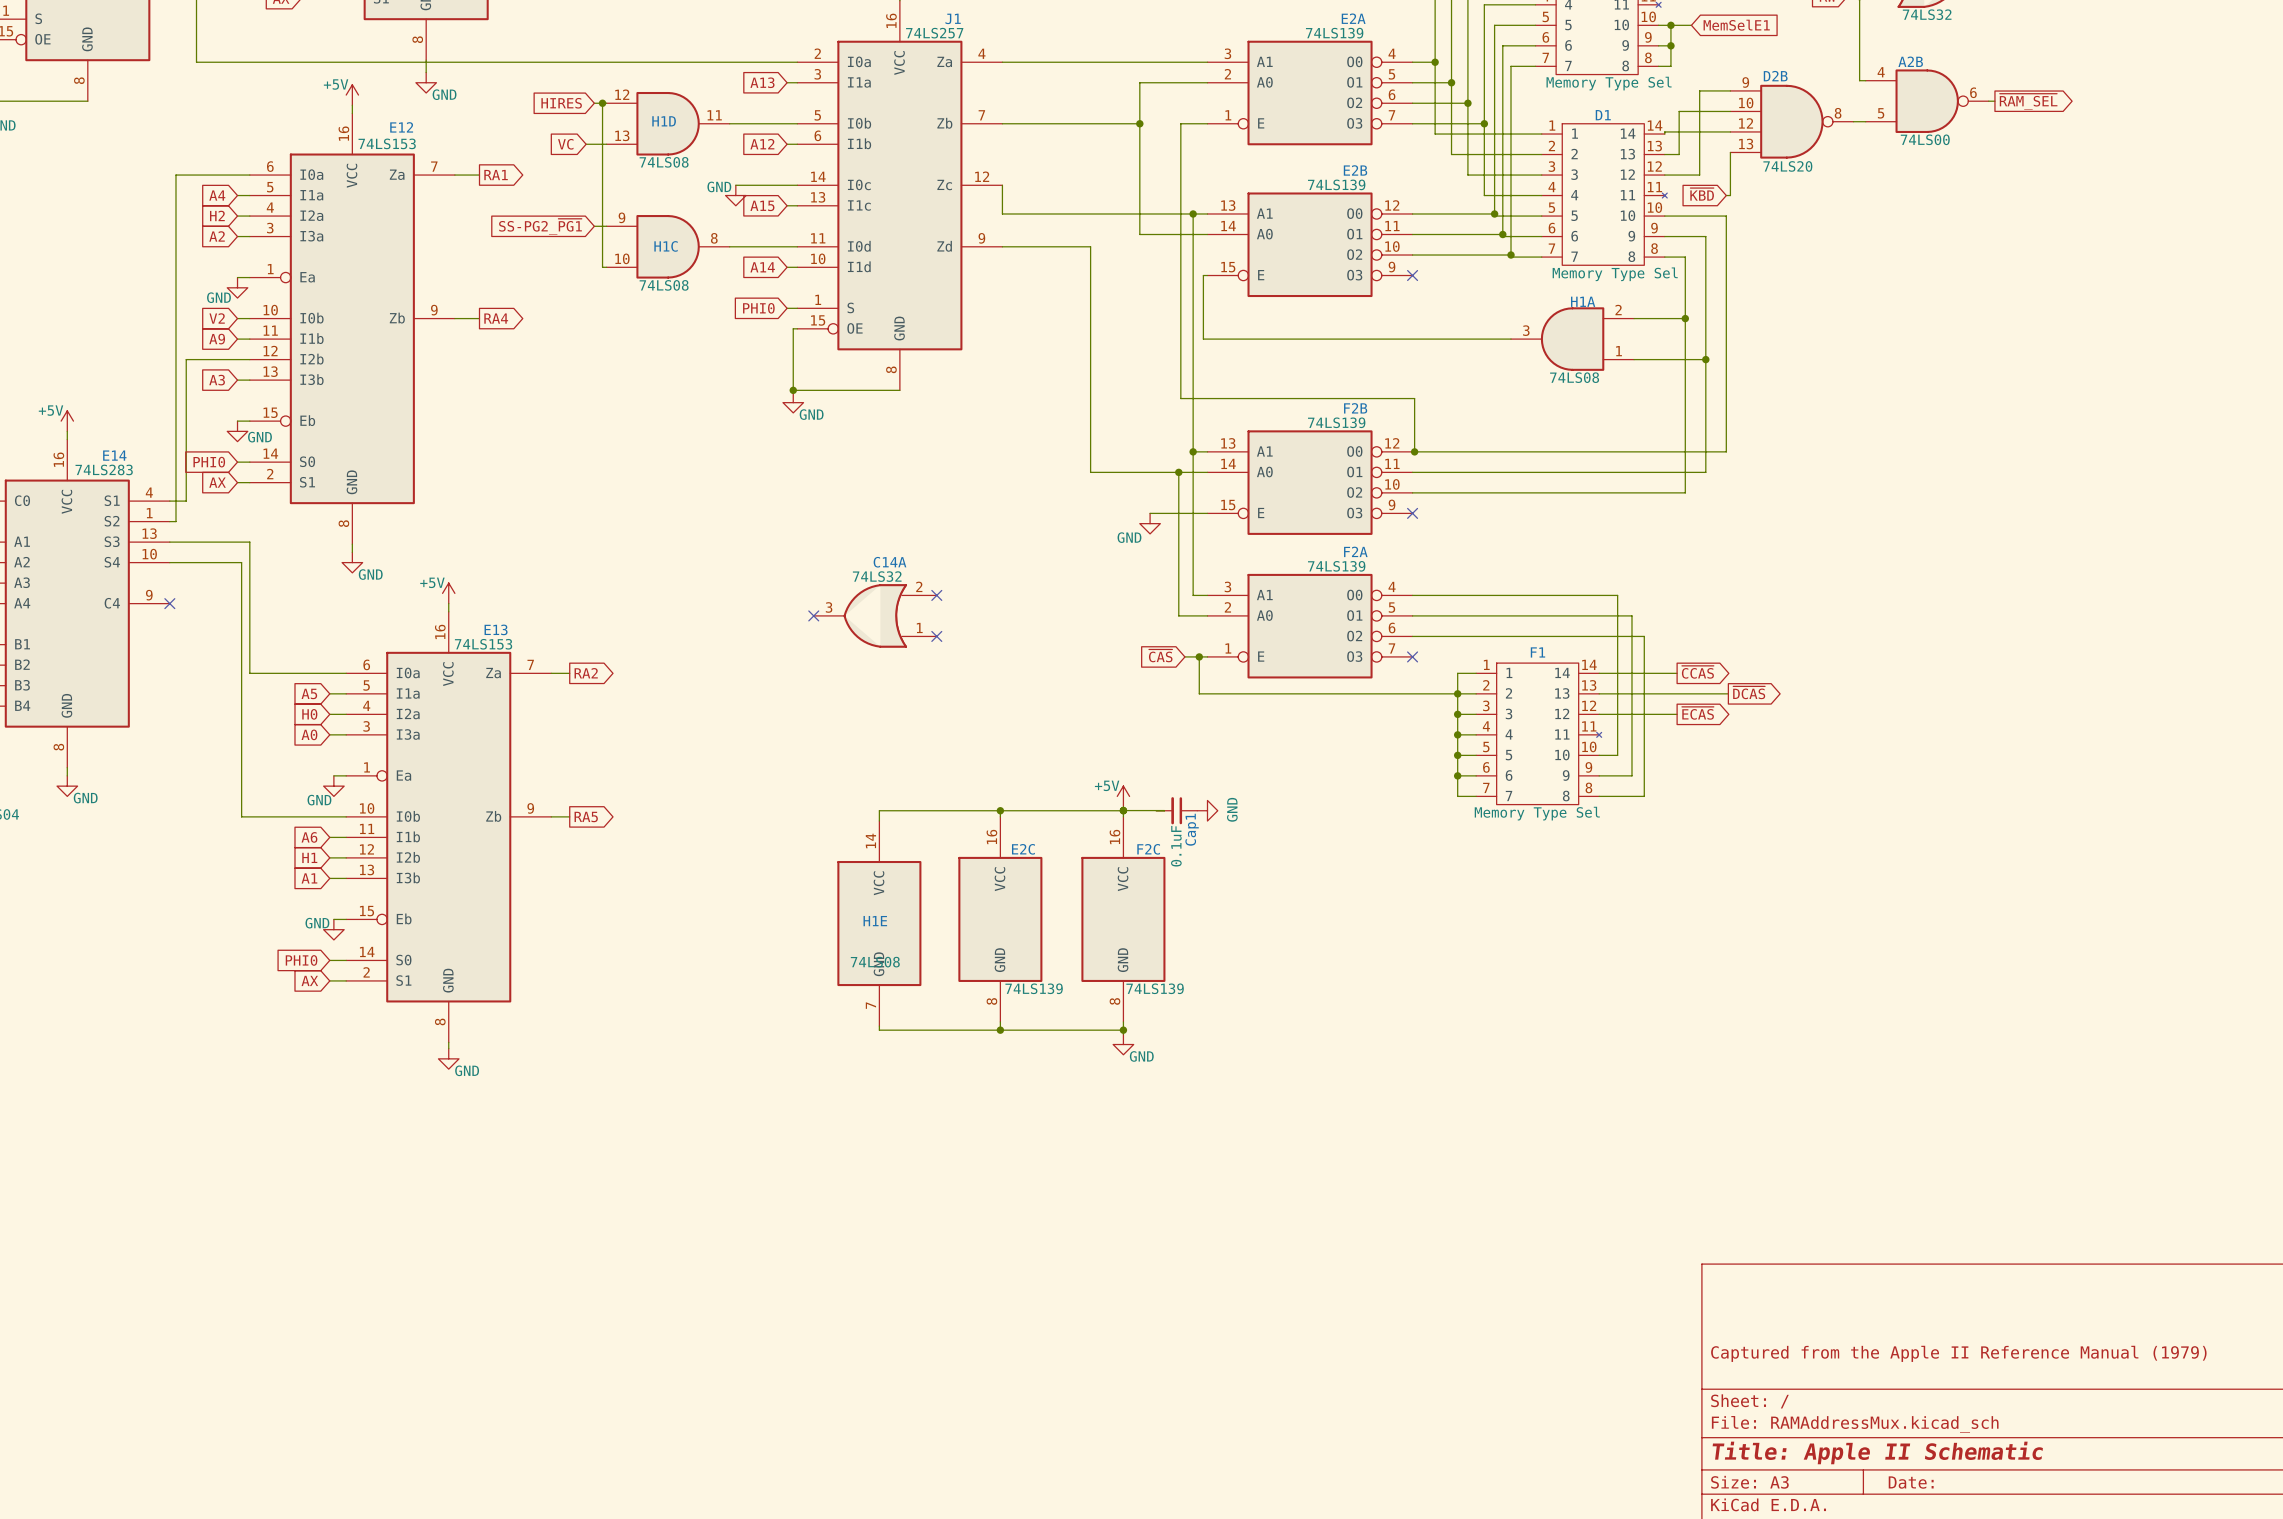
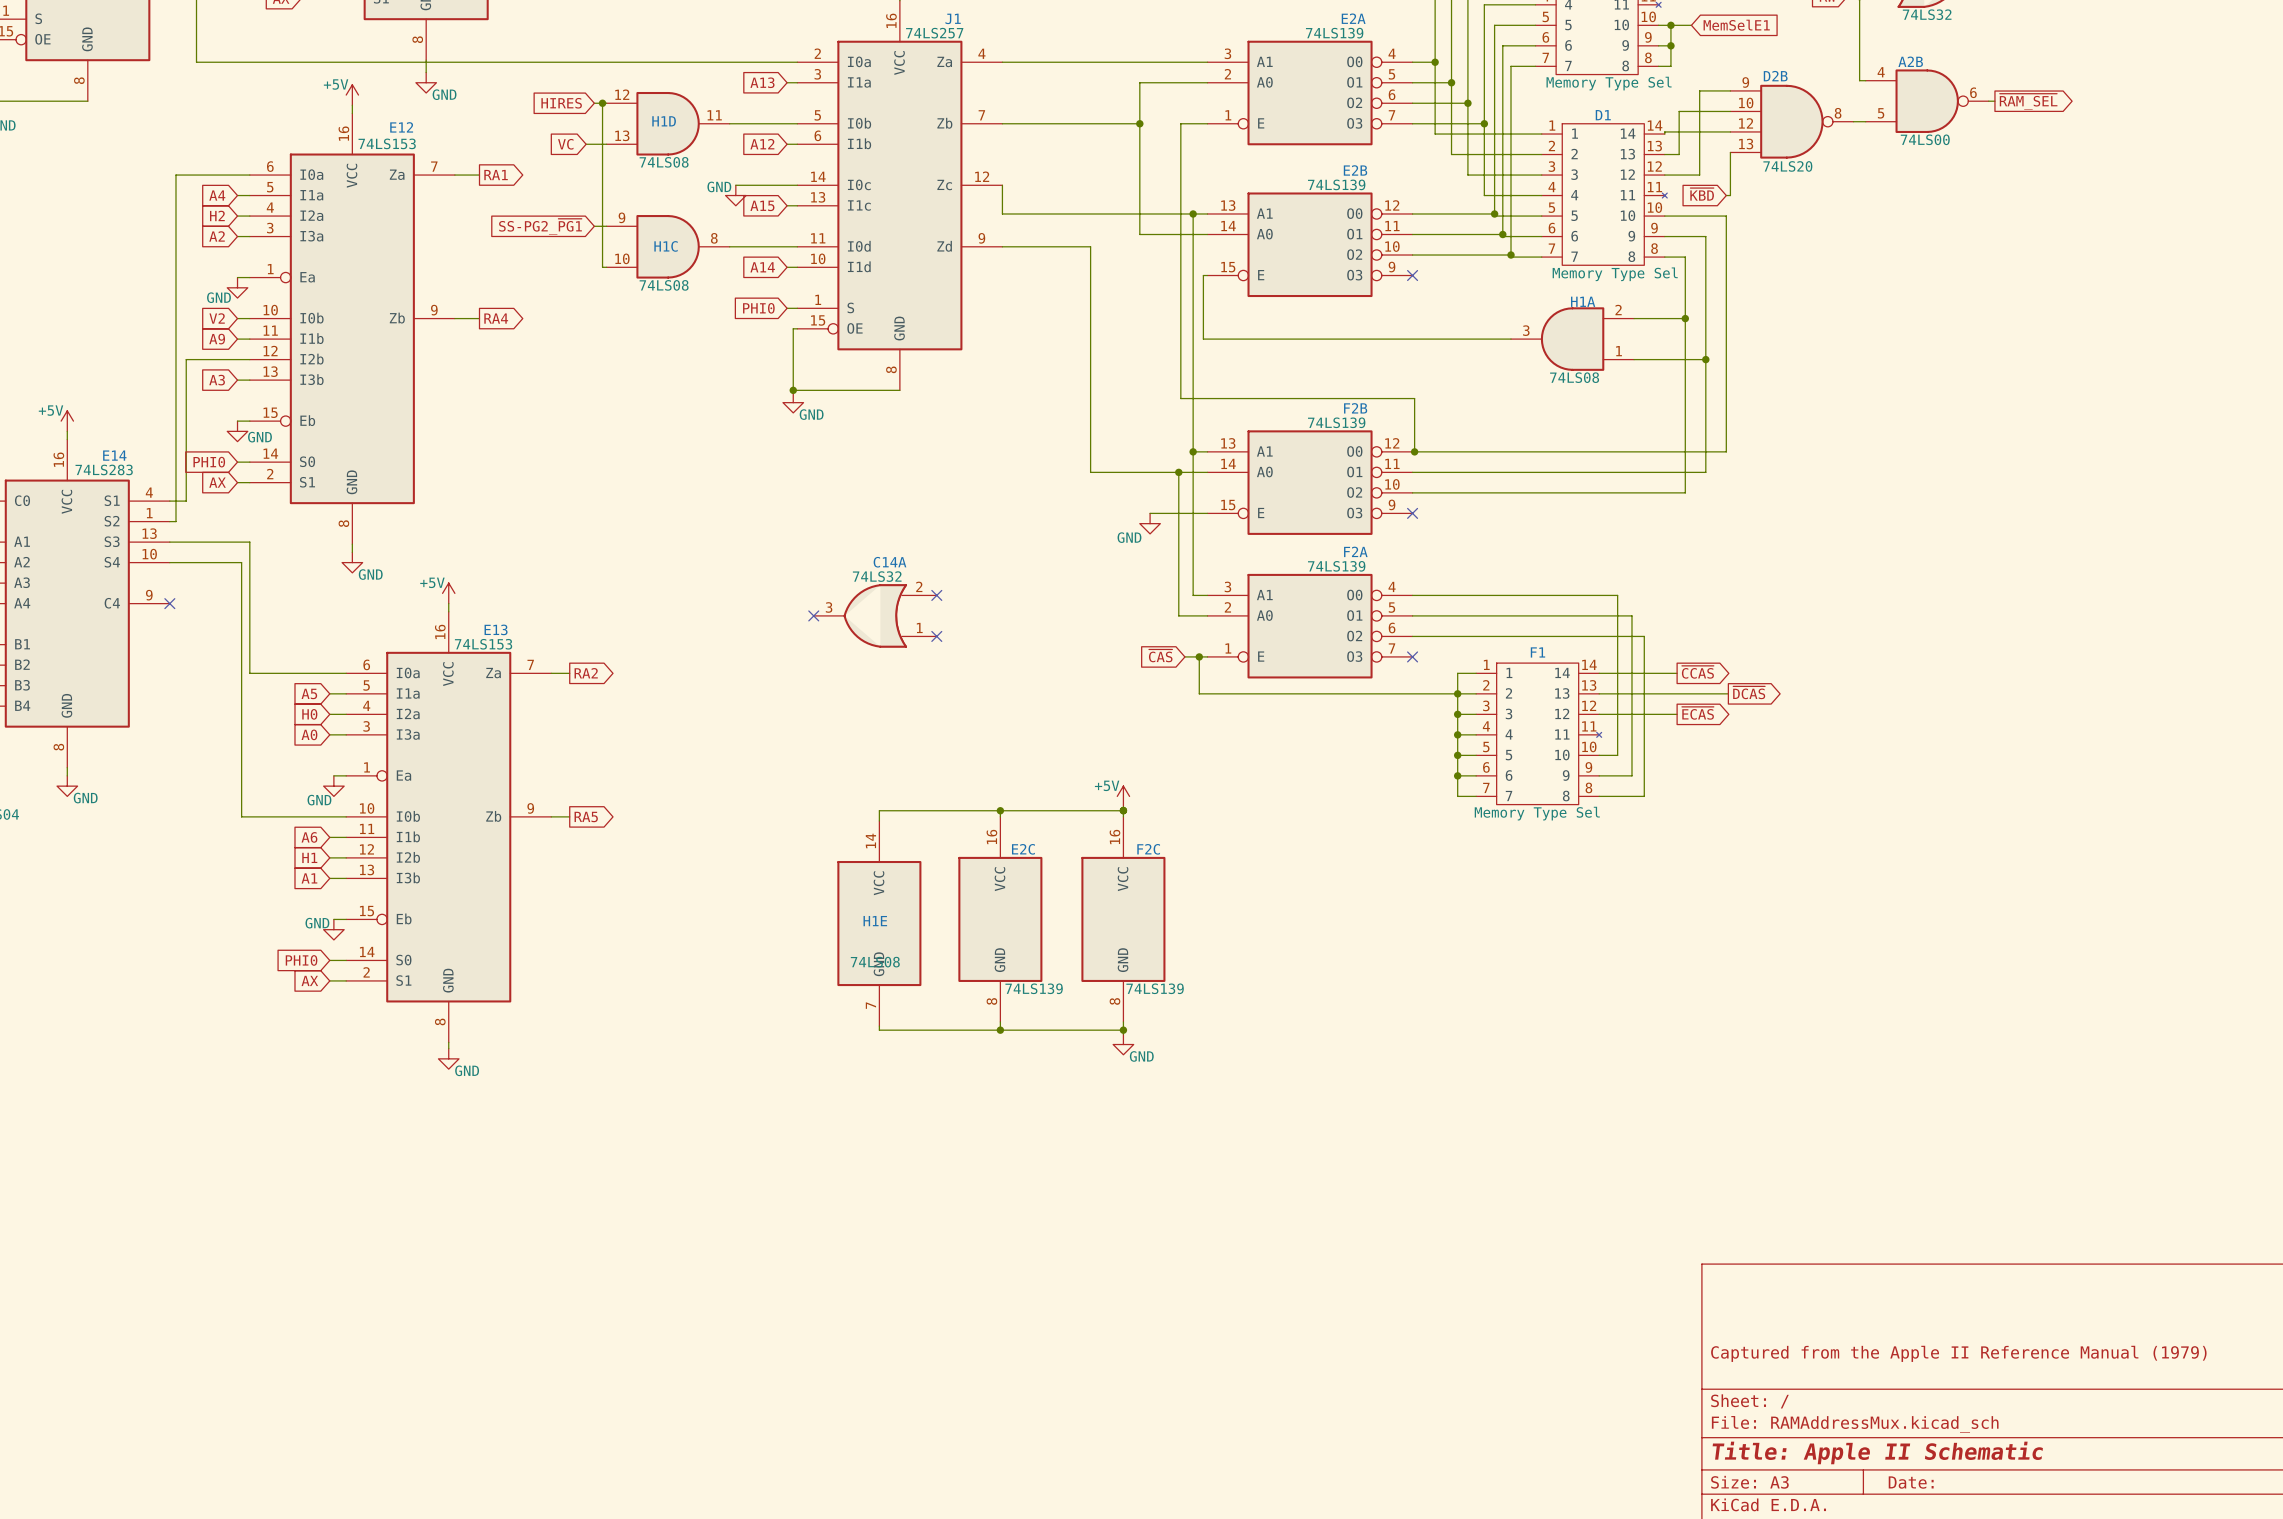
wire: (1123, 810) (1164, 810) (1156, 810) -> none
Cap1: 0.1uF (1176, 810) -> none
power symbol: GND (1207, 810) -> none

